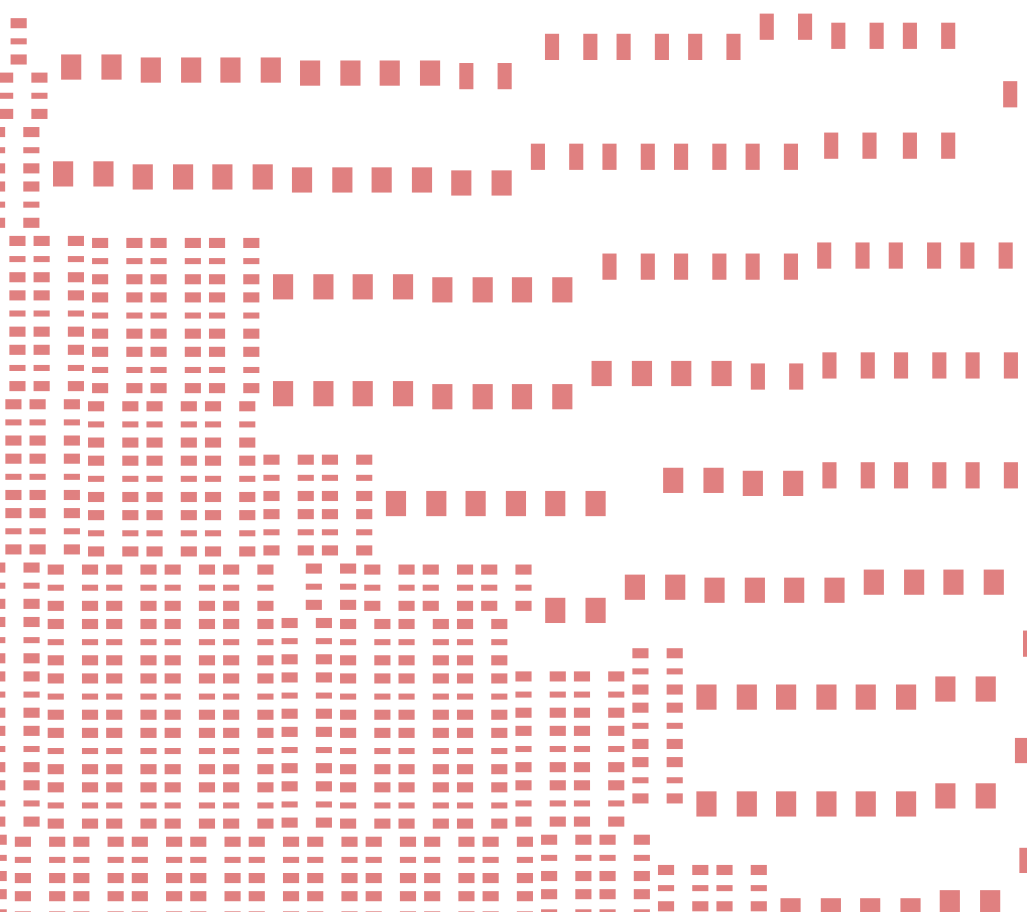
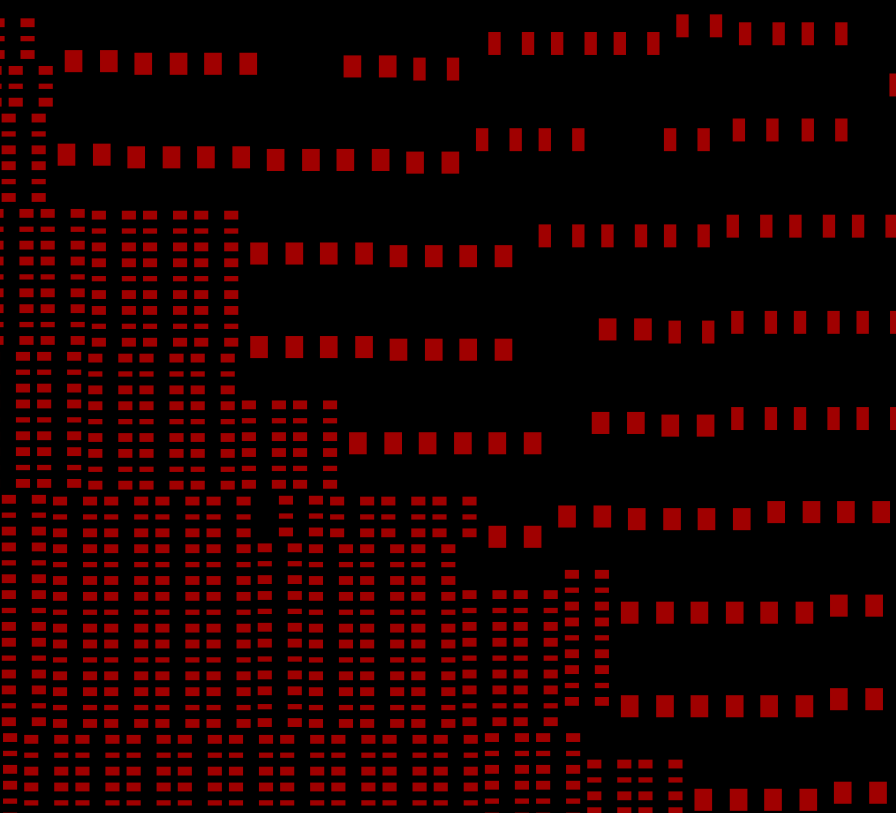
part: (330, 73) -> none
part: (700, 156) -> none
part: (621, 373) -> none

